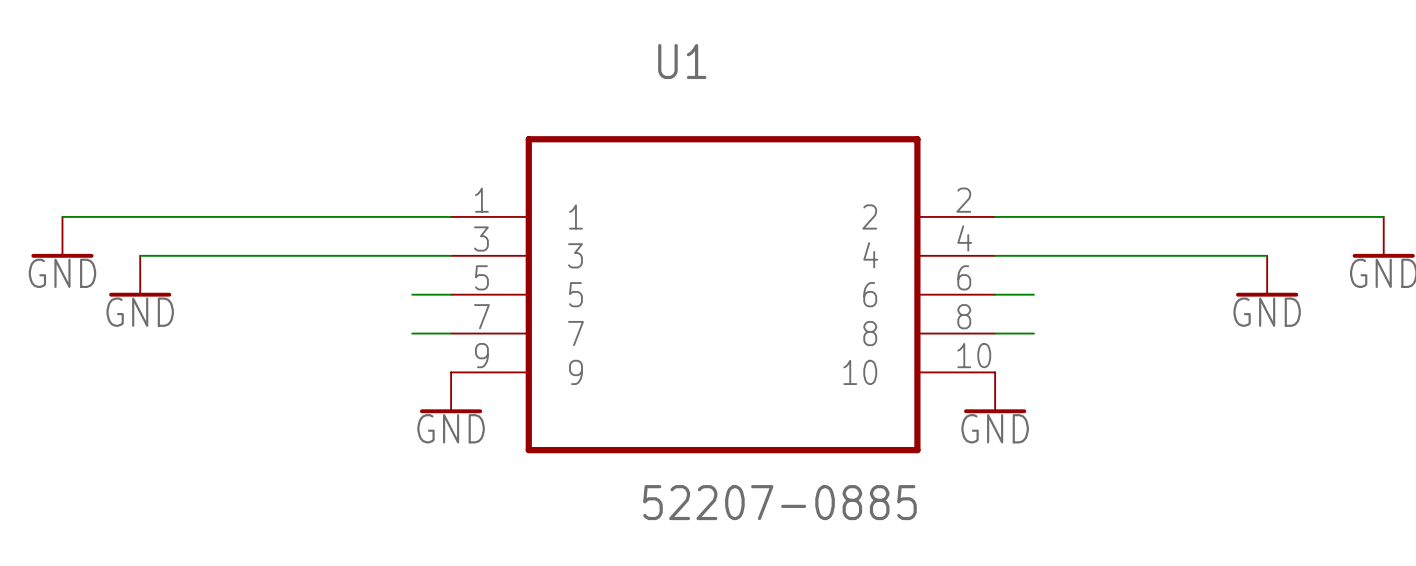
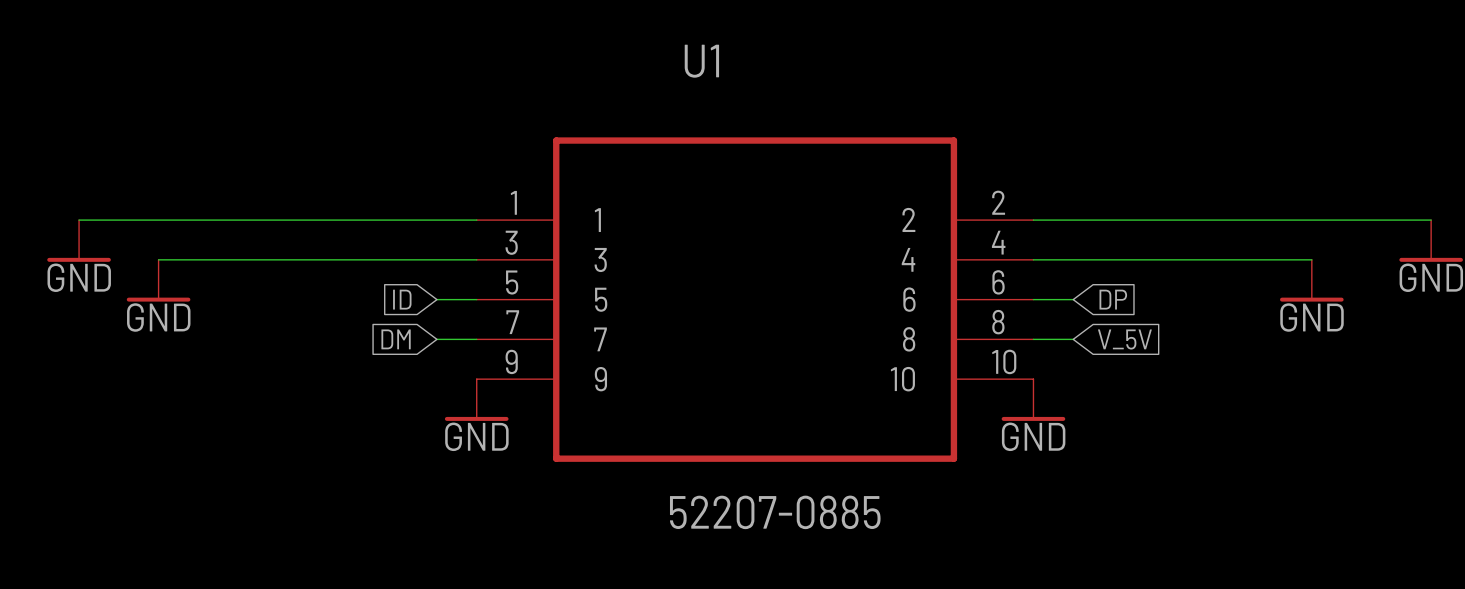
global label: none -> ID (402, 299)
global label: none -> DP (1113, 299)
global label: none -> DM (396, 339)
global label: none -> V_5V (1124, 339)

